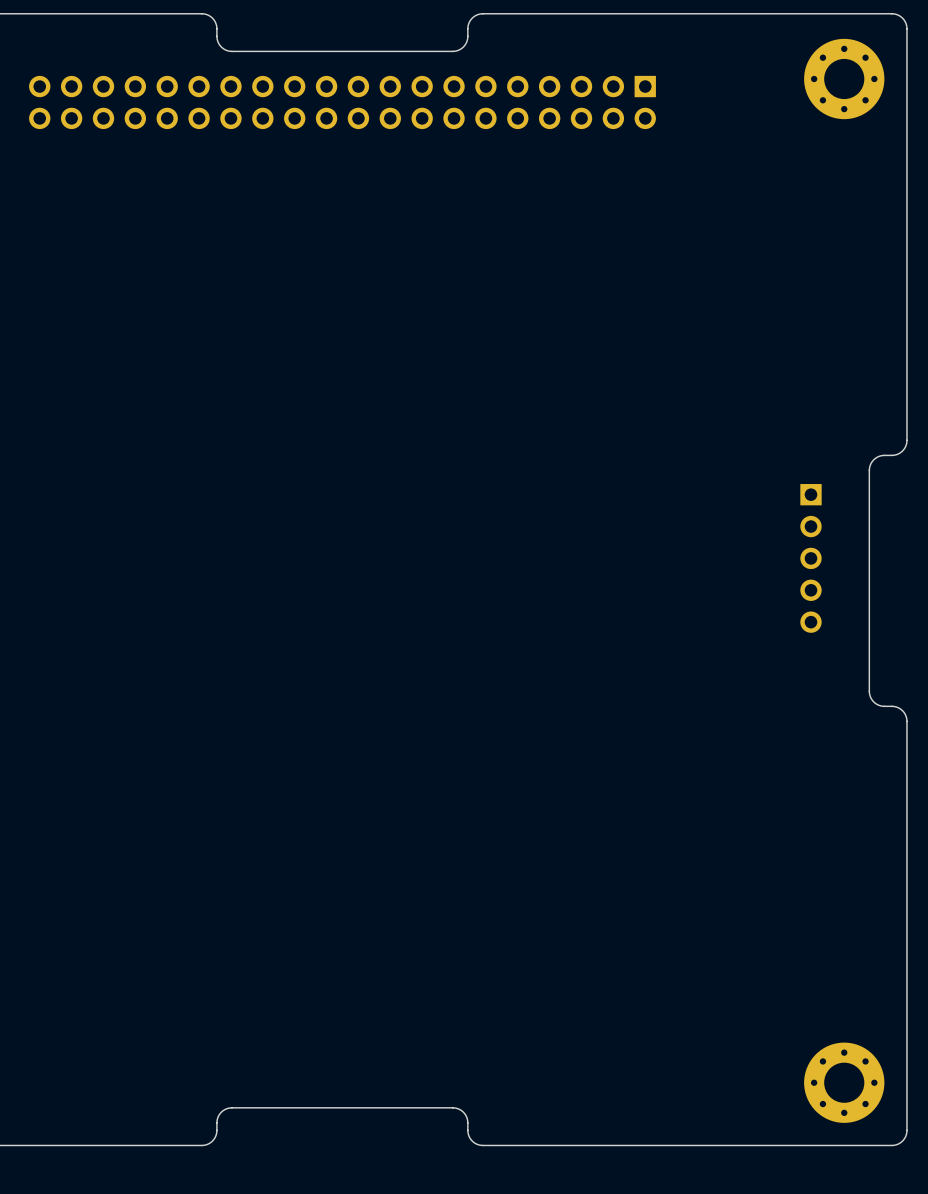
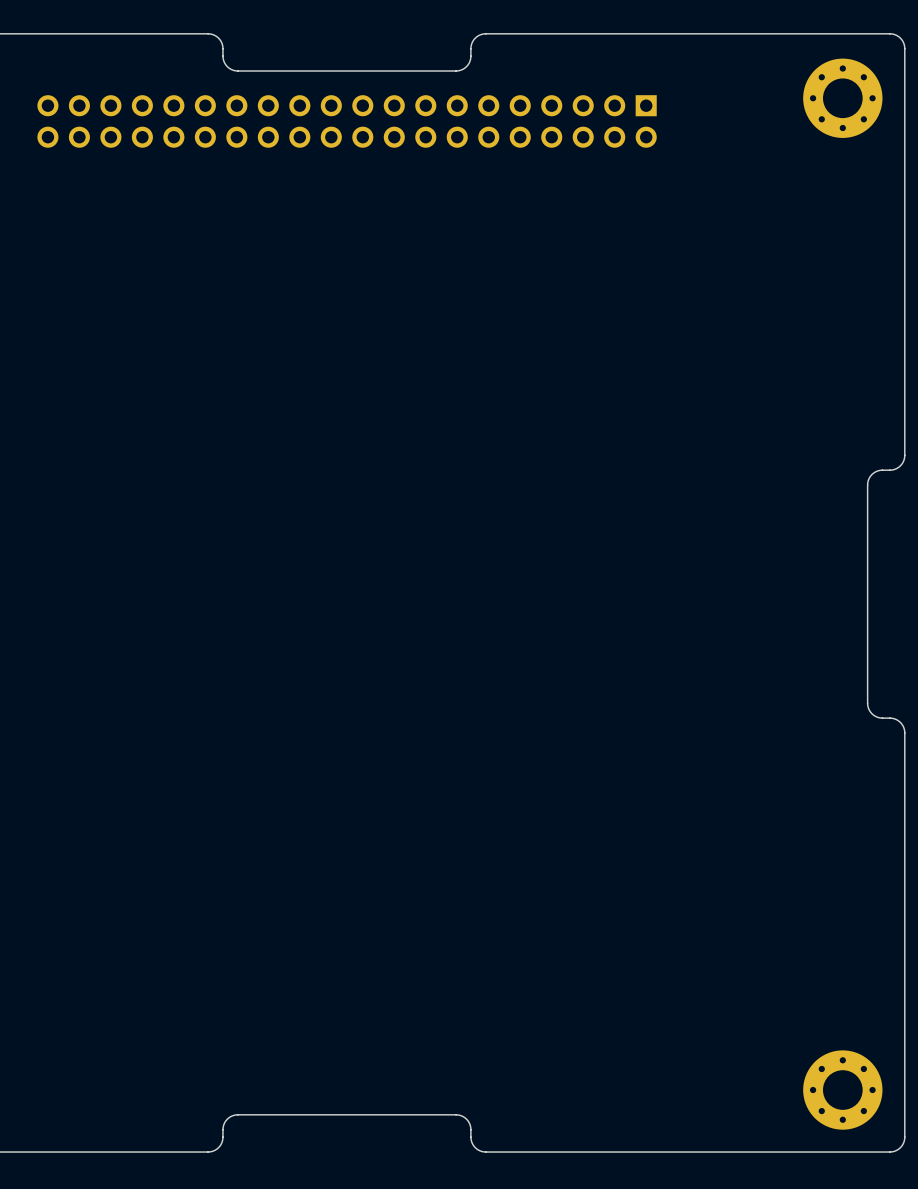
part: (811, 558) -> none

